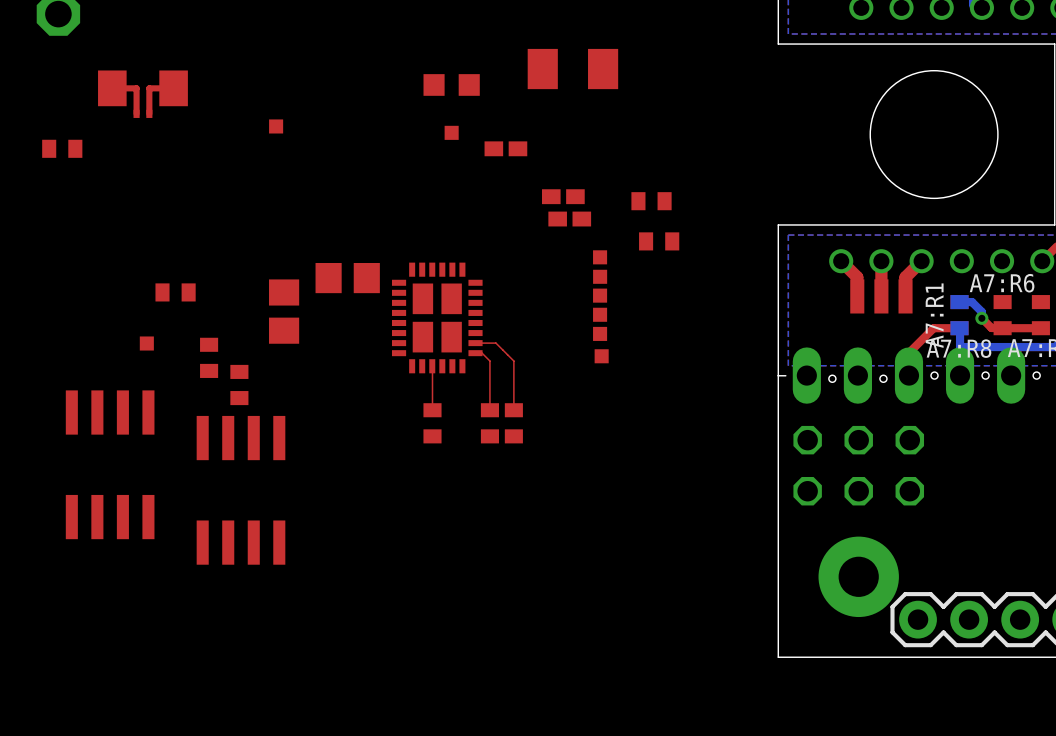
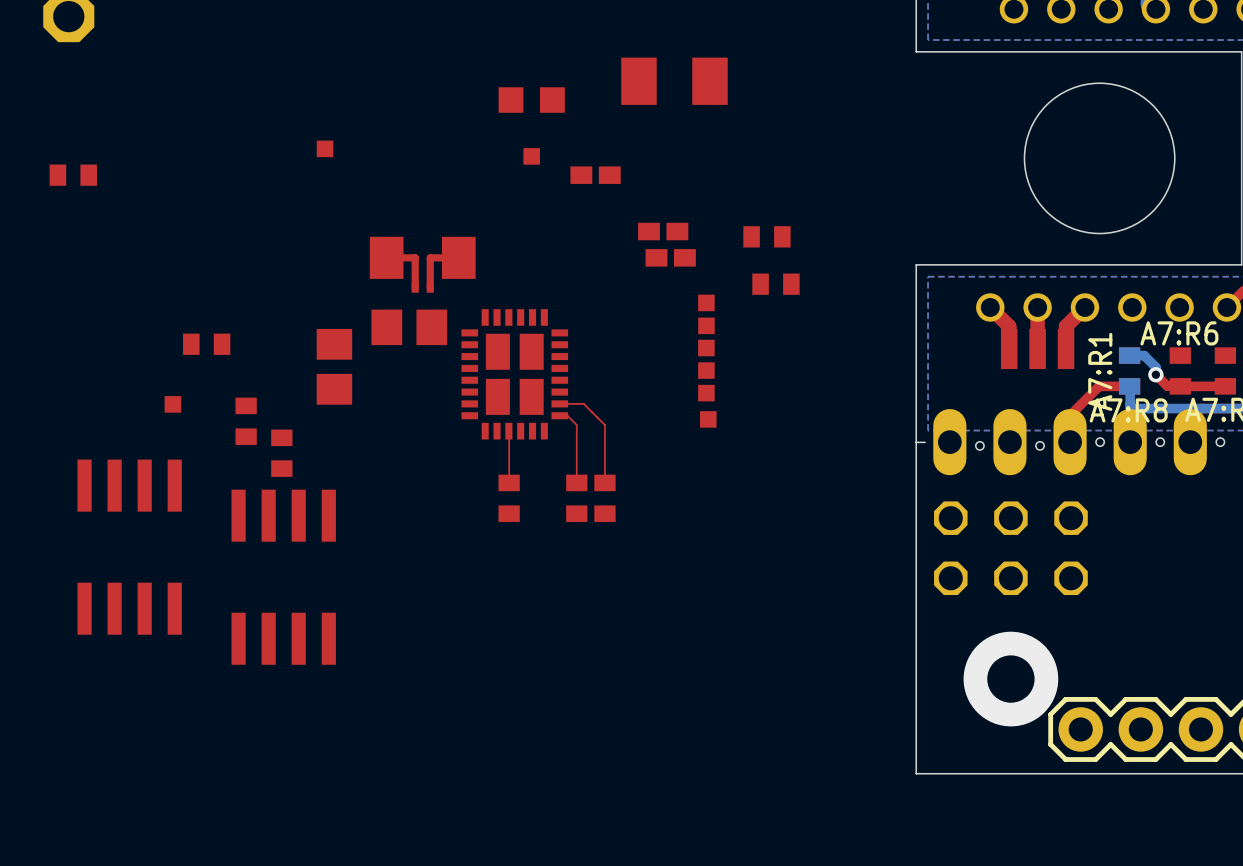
part position: (142, 94) -> (422, 264)

